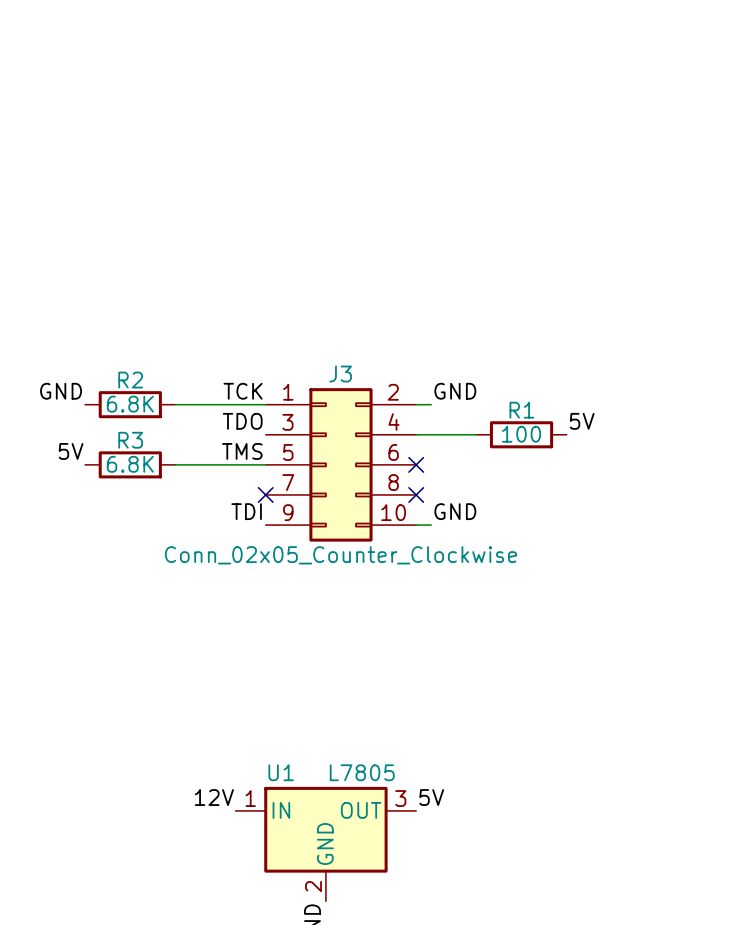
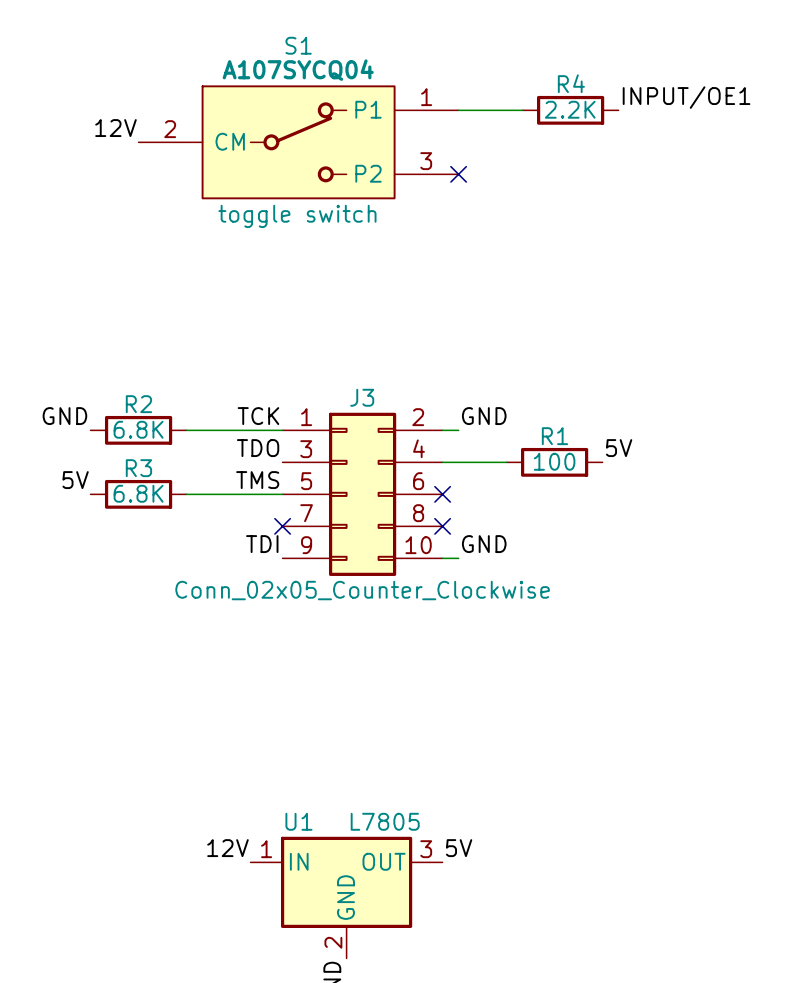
label: none -> INPUT/OE1 (686, 97)
wire: none -> (458, 110) (522, 110)
R4: none -> 2.2K (570, 110)
label: none -> 12V (115, 128)
S1: none -> A107SYCQ04 (298, 142)
no-connect mark: none -> (458, 174)

